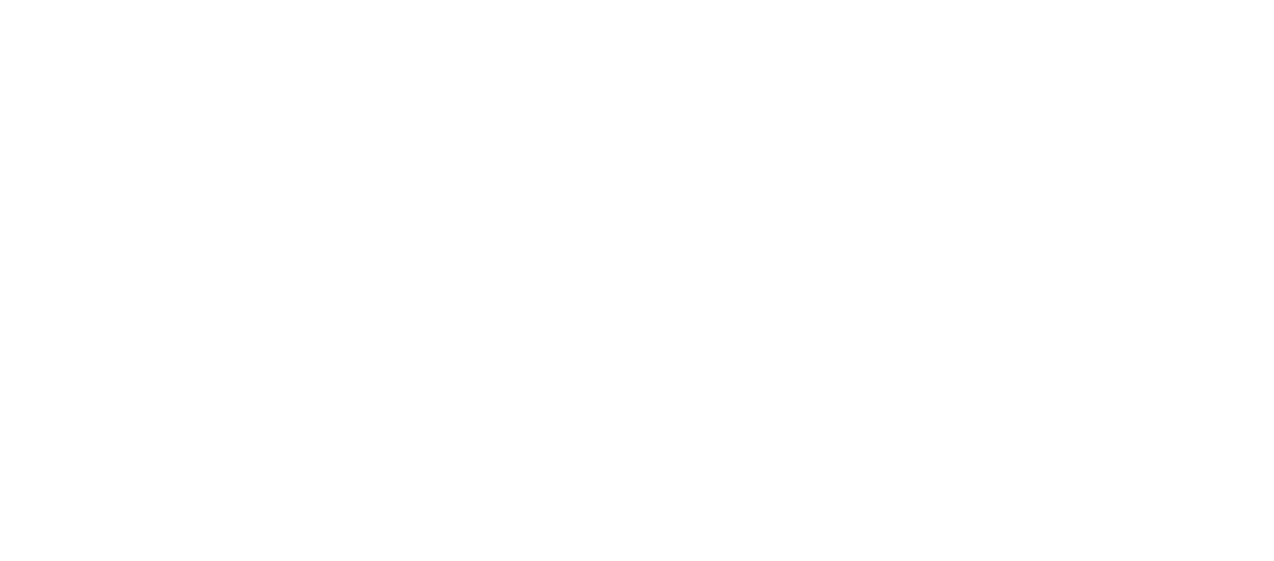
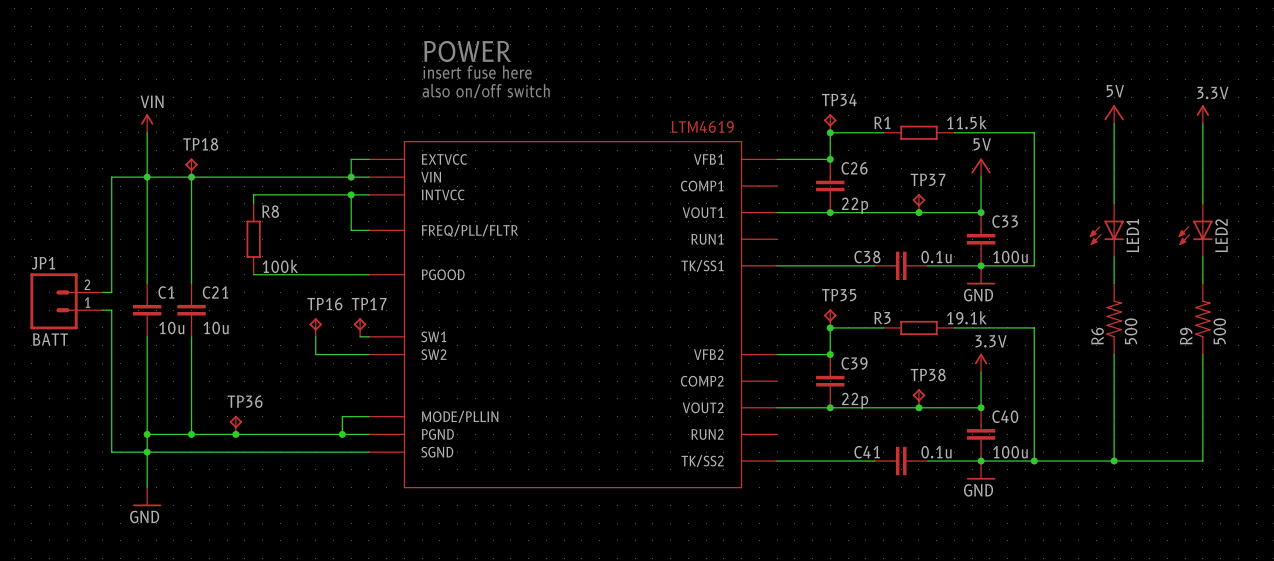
text: none -> POWER (467, 51)
text: none -> insert fuse here (477, 72)
text: none -> also on/off switch (486, 91)
power symbol: none -> 5V (1114, 114)
power symbol: none -> 3.3V (1202, 114)
power symbol: none -> VIN (147, 123)
TP34: none -> (830, 123)
wire: none -> (1114, 123) (1114, 203)
wire: none -> (1202, 123) (1202, 203)
wire: none -> (147, 132) (147, 283)
junction: none -> (830, 132)
wire: none -> (883, 132) (830, 132) (830, 159) (777, 159)
R1: none -> 11.5k (918, 132)
wire: none -> (954, 132) (1034, 132) (1034, 265) (927, 265)
wire: none -> (368, 159) (351, 159) (351, 177)
junction: none -> (830, 159)
TP18: none -> (191, 167)
power symbol: none -> 5V (981, 167)
junction: none -> (147, 177)
wire: none -> (191, 177) (191, 283)
junction: none -> (191, 177)
junction: none -> (351, 177)
wire: none -> (368, 177) (111, 177) (111, 292) (102, 292)
wire: none -> (981, 177) (981, 212) (777, 212)
C26: none -> 22p (830, 186)
wire: none -> (351, 194) (351, 230) (368, 230)
junction: none -> (351, 194)
wire: none -> (368, 194) (253, 194) (253, 203)
TP37: none -> (918, 203)
junction: none -> (830, 212)
junction: none -> (918, 212)
junction: none -> (981, 212)
LED1: none -> (1106, 230)
LED2: none -> (1195, 230)
R8: none -> 100k (253, 239)
C33: none -> 100u (981, 239)
wire: none -> (1114, 256) (1114, 283)
wire: none -> (1202, 256) (1202, 283)
wire: none -> (777, 265) (874, 265)
C38: none -> 0.1u (901, 265)
junction: none -> (981, 265)
wire: none -> (253, 274) (368, 274)
power symbol: none -> GND (981, 275)
JP1: none -> BATT (66, 301)
wire: none -> (102, 310) (111, 310) (111, 452) (368, 452)
C1: none -> 10u (147, 310)
C21: none -> 10u (191, 310)
part: none -> (572, 314)
TP35: none -> (830, 318)
R6: none -> 500 (1114, 319)
R9: none -> 500 (1202, 319)
TP16: none -> (315, 327)
TP17: none -> (360, 327)
junction: none -> (830, 327)
wire: none -> (883, 327) (830, 327) (830, 354) (777, 354)
R3: none -> 19.1k (918, 327)
wire: none -> (954, 327) (1034, 327) (1034, 461)
wire: none -> (147, 336) (147, 487)
wire: none -> (191, 336) (191, 434)
wire: none -> (315, 336) (315, 354) (368, 354)
wire: none -> (360, 336) (368, 336)
junction: none -> (830, 354)
wire: none -> (1114, 354) (1114, 461)
wire: none -> (1202, 354) (1202, 461) (927, 461)
power symbol: none -> 3.3V (981, 362)
wire: none -> (981, 372) (981, 407) (777, 407)
C39: none -> 22p (830, 381)
TP38: none -> (918, 398)
junction: none -> (830, 407)
junction: none -> (918, 407)
junction: none -> (981, 407)
wire: none -> (368, 416) (342, 416) (342, 434)
TP36: none -> (235, 425)
wire: none -> (147, 434) (368, 434)
junction: none -> (147, 434)
junction: none -> (191, 434)
junction: none -> (235, 434)
junction: none -> (342, 434)
C40: none -> 100u (981, 434)
junction: none -> (147, 452)
wire: none -> (777, 461) (874, 461)
C41: none -> 0.1u (901, 461)
junction: none -> (981, 461)
junction: none -> (1034, 461)
junction: none -> (1114, 461)
power symbol: none -> GND (981, 470)
power symbol: none -> GND (147, 496)

